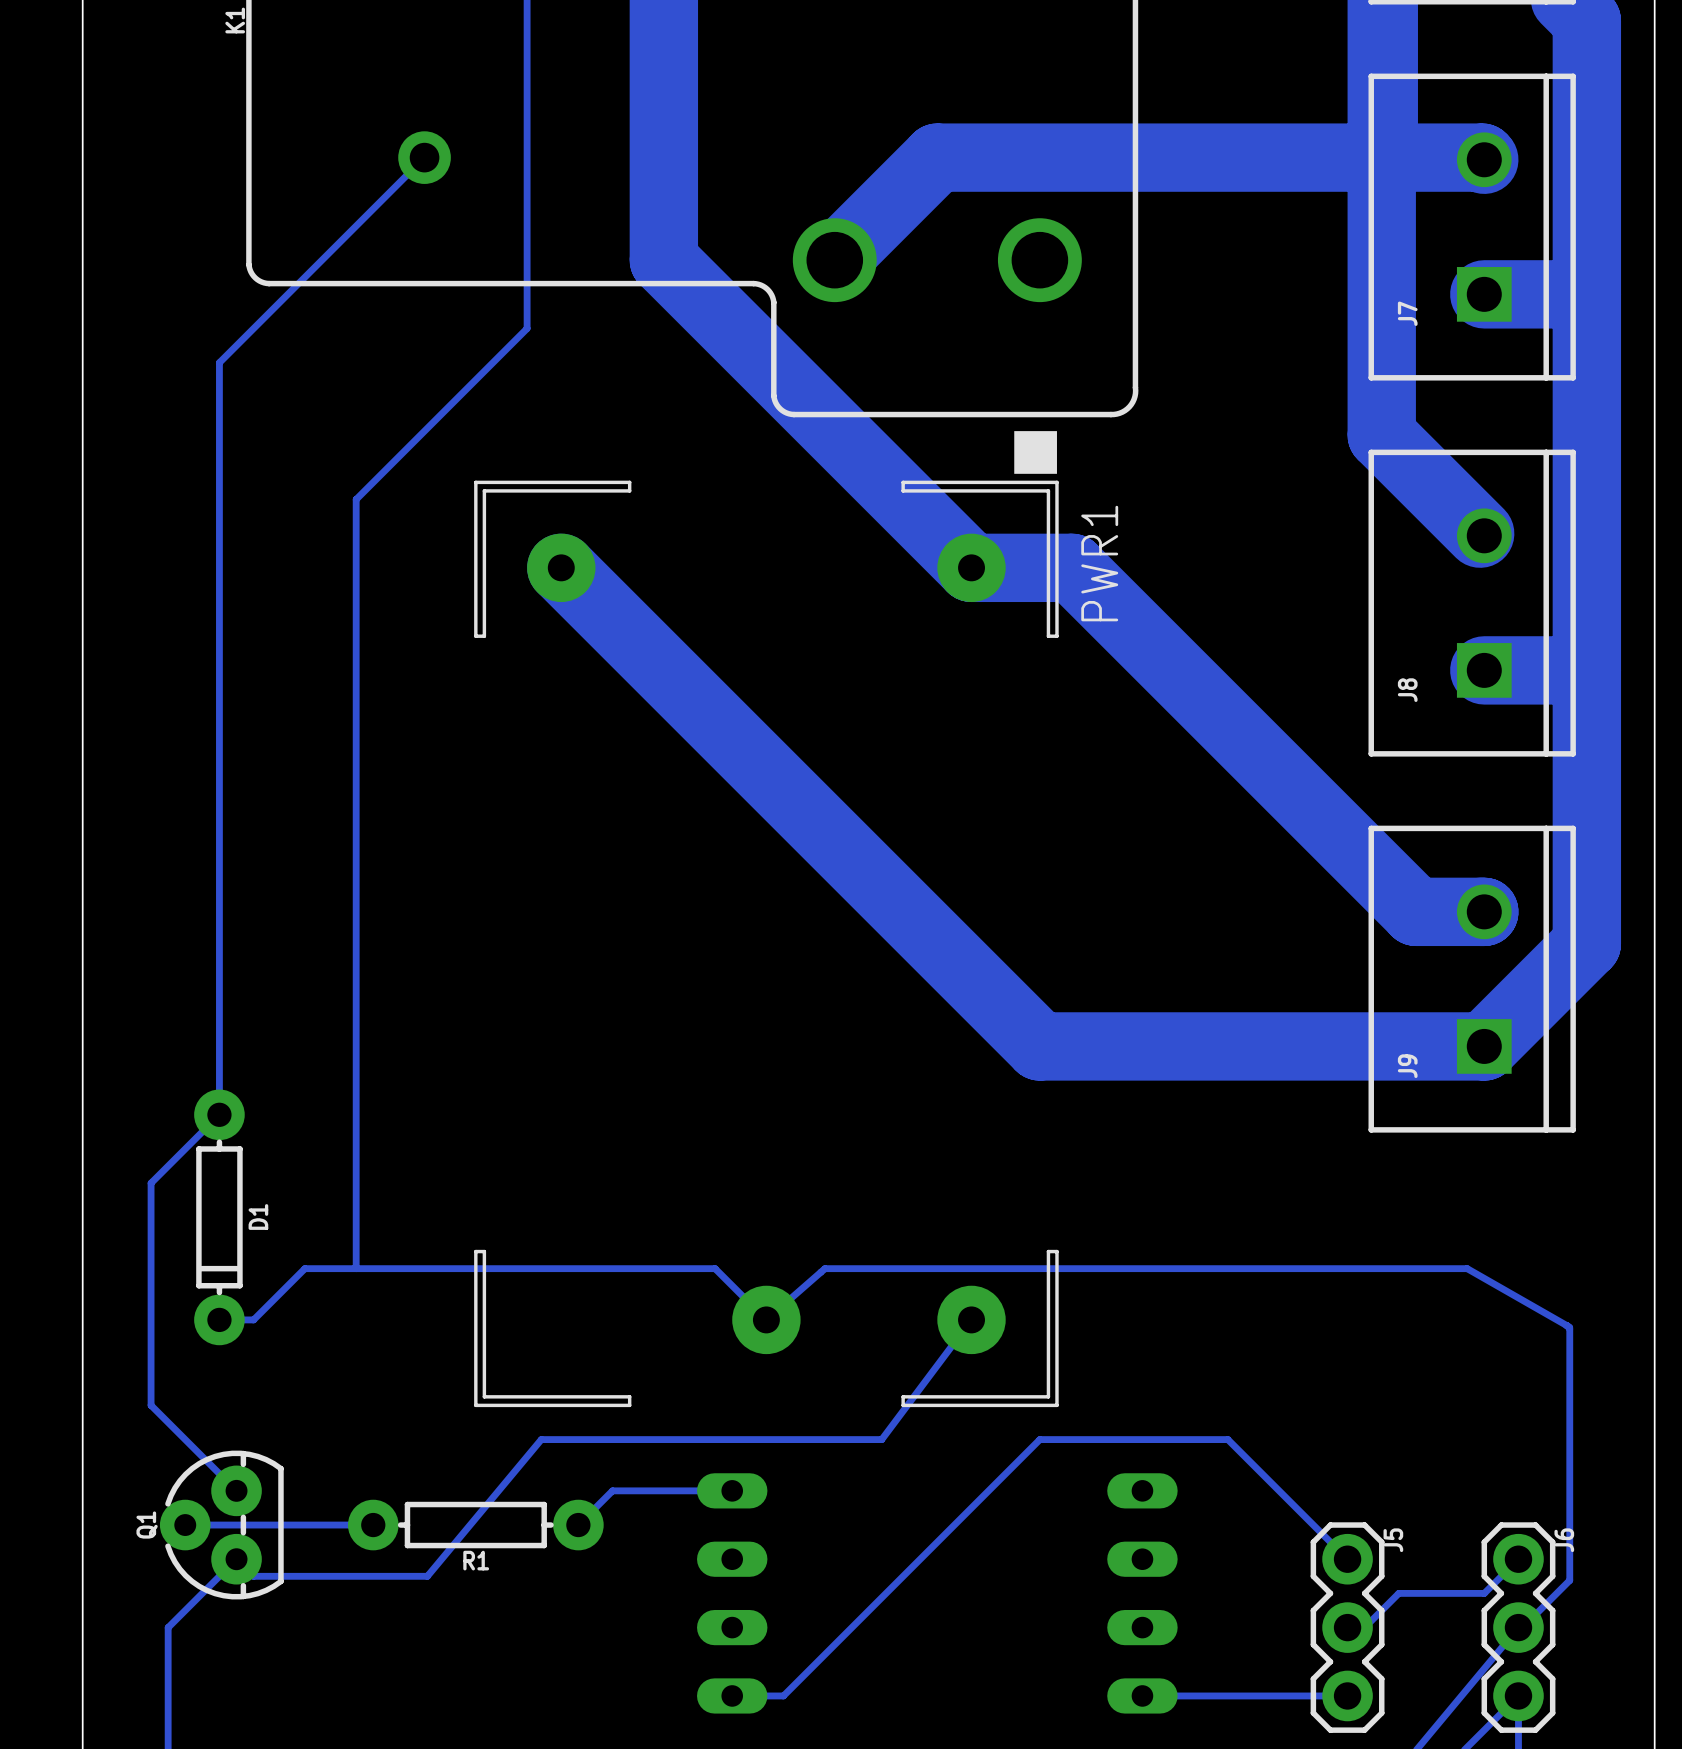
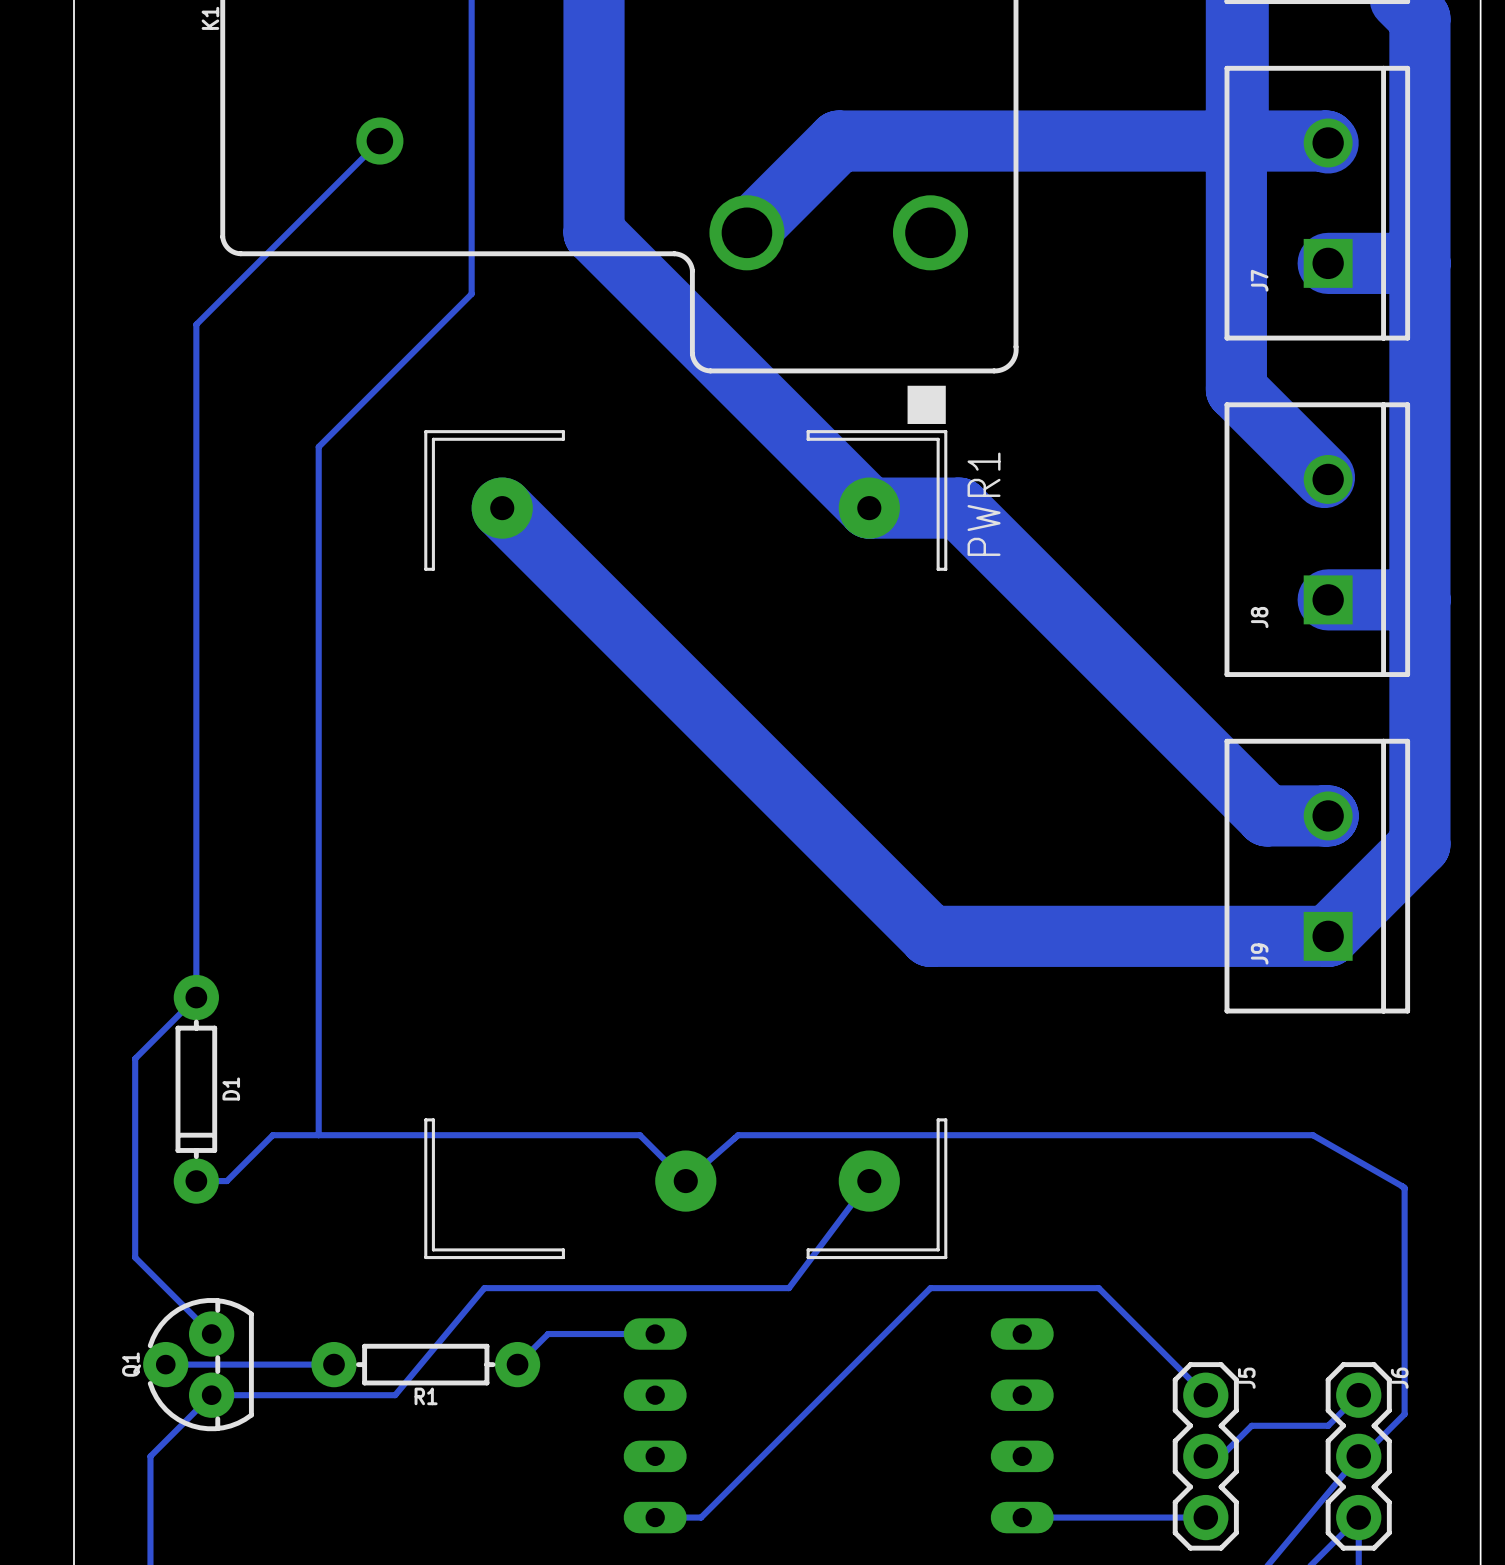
bottom track: (236, 1559) (253, 1576) (427, 1576) (441, 1559) -> (211, 1395) (395, 1395)

